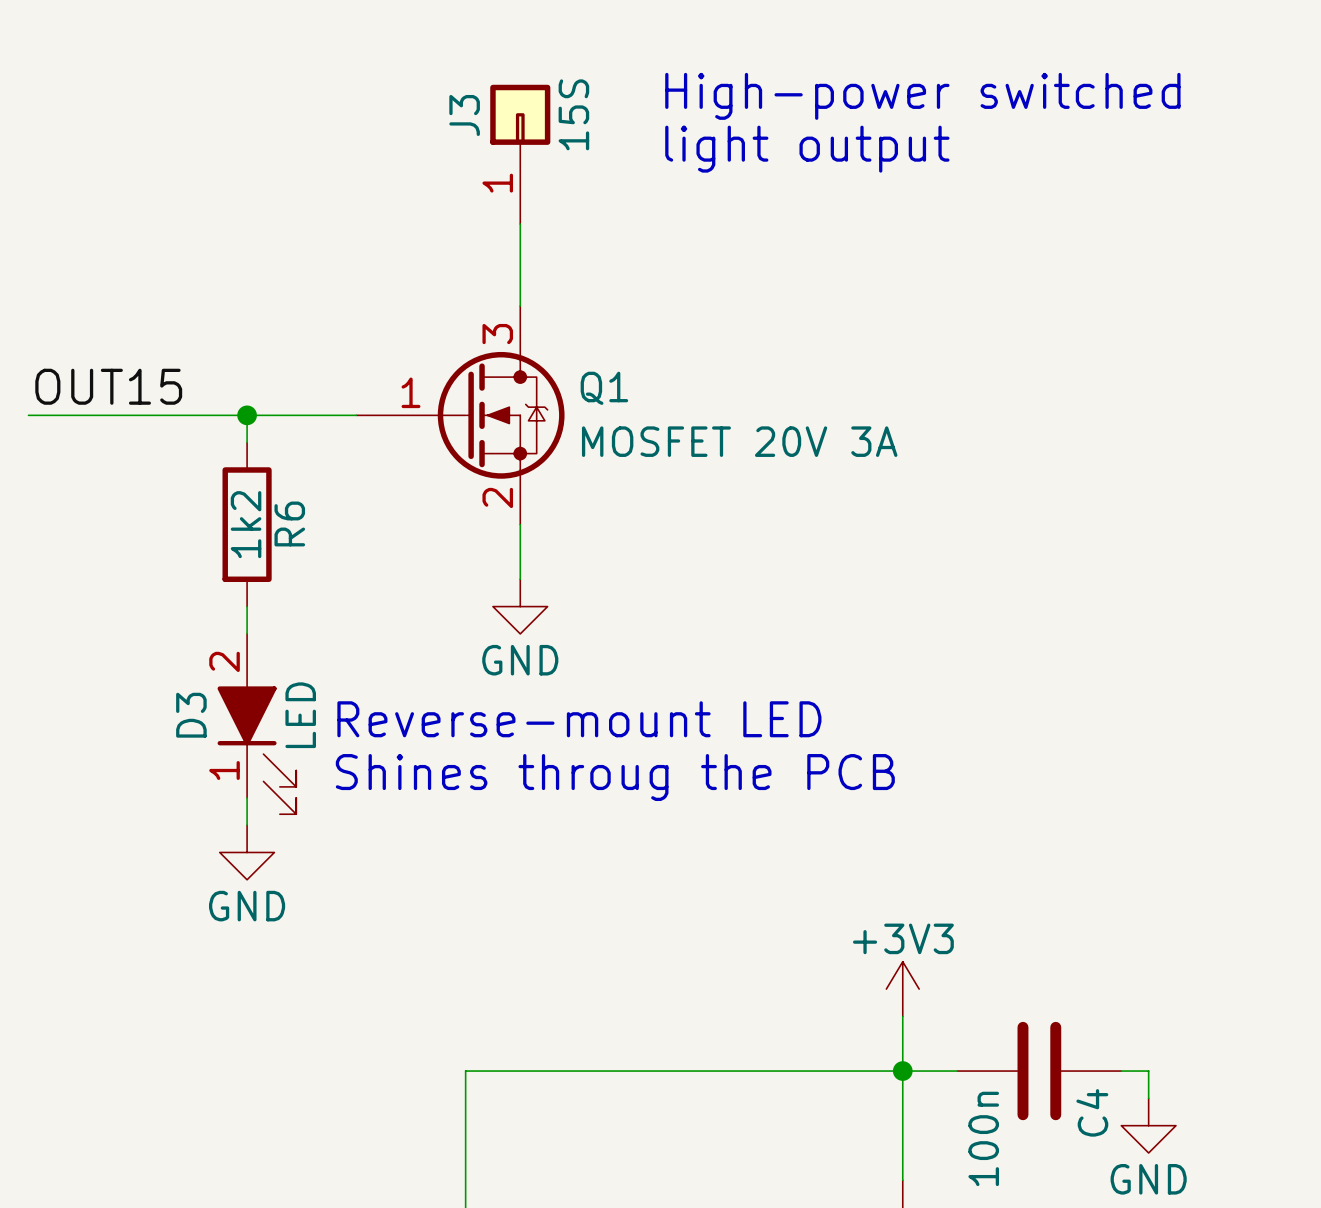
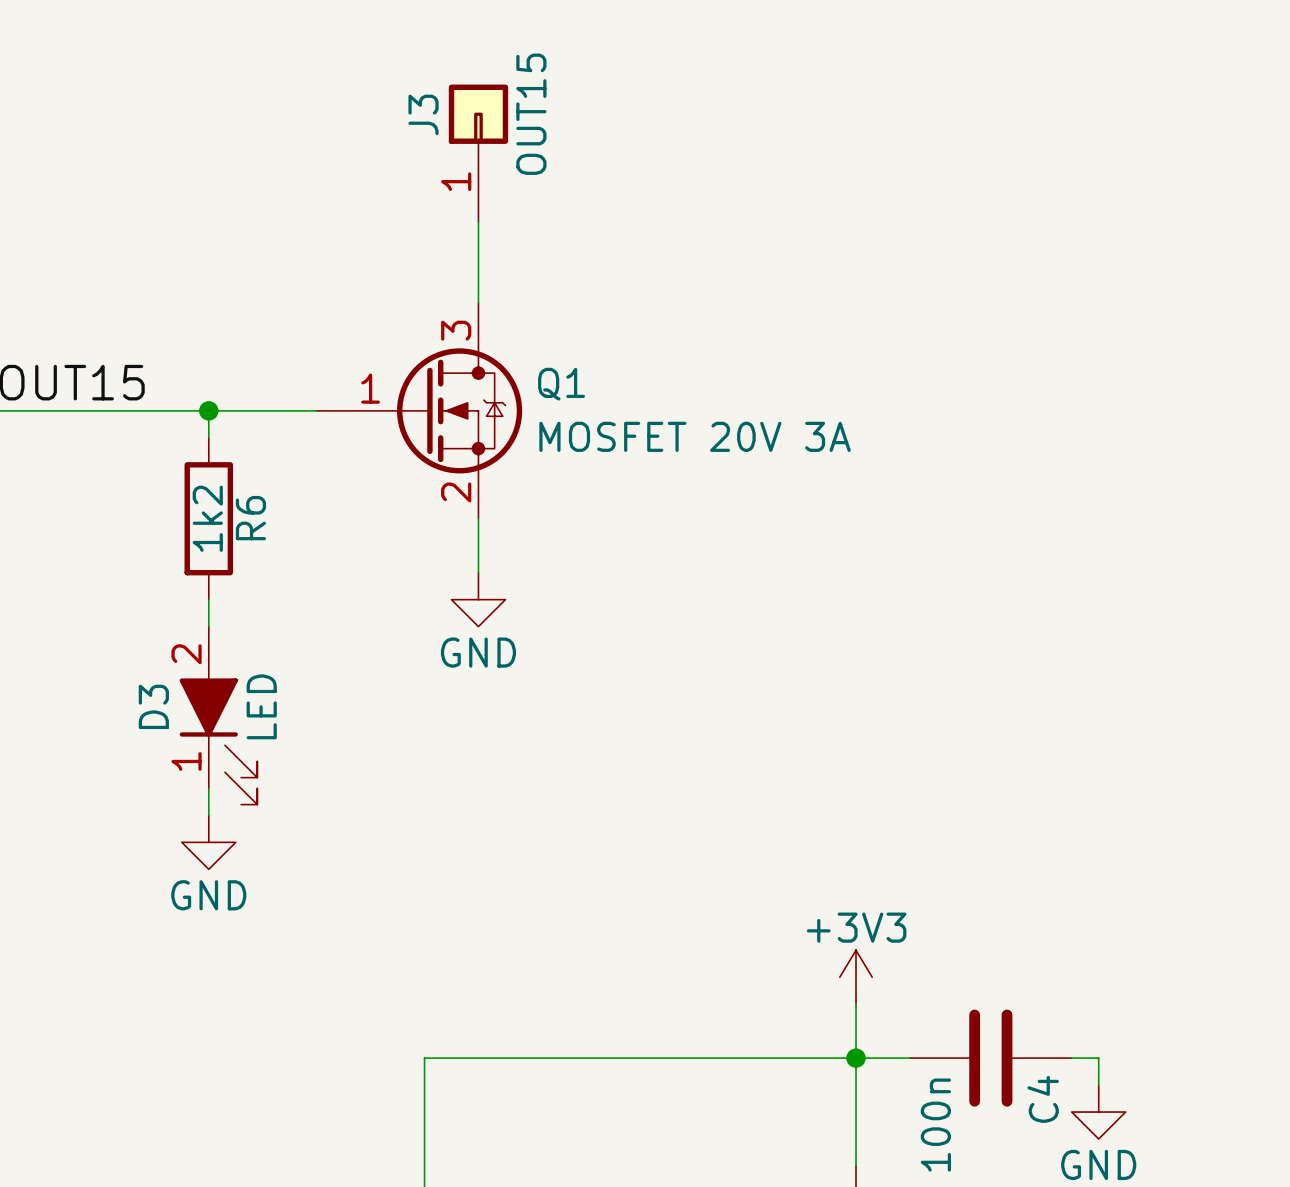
text: High-power switched (922, 96) -> none
J3 value: 15S (573, 114) -> OUT15 (531, 114)
text: light output (807, 149) -> none
text: Reverse-mount LED (579, 719) -> none
text: Shines throug the PCB (615, 777) -> none

